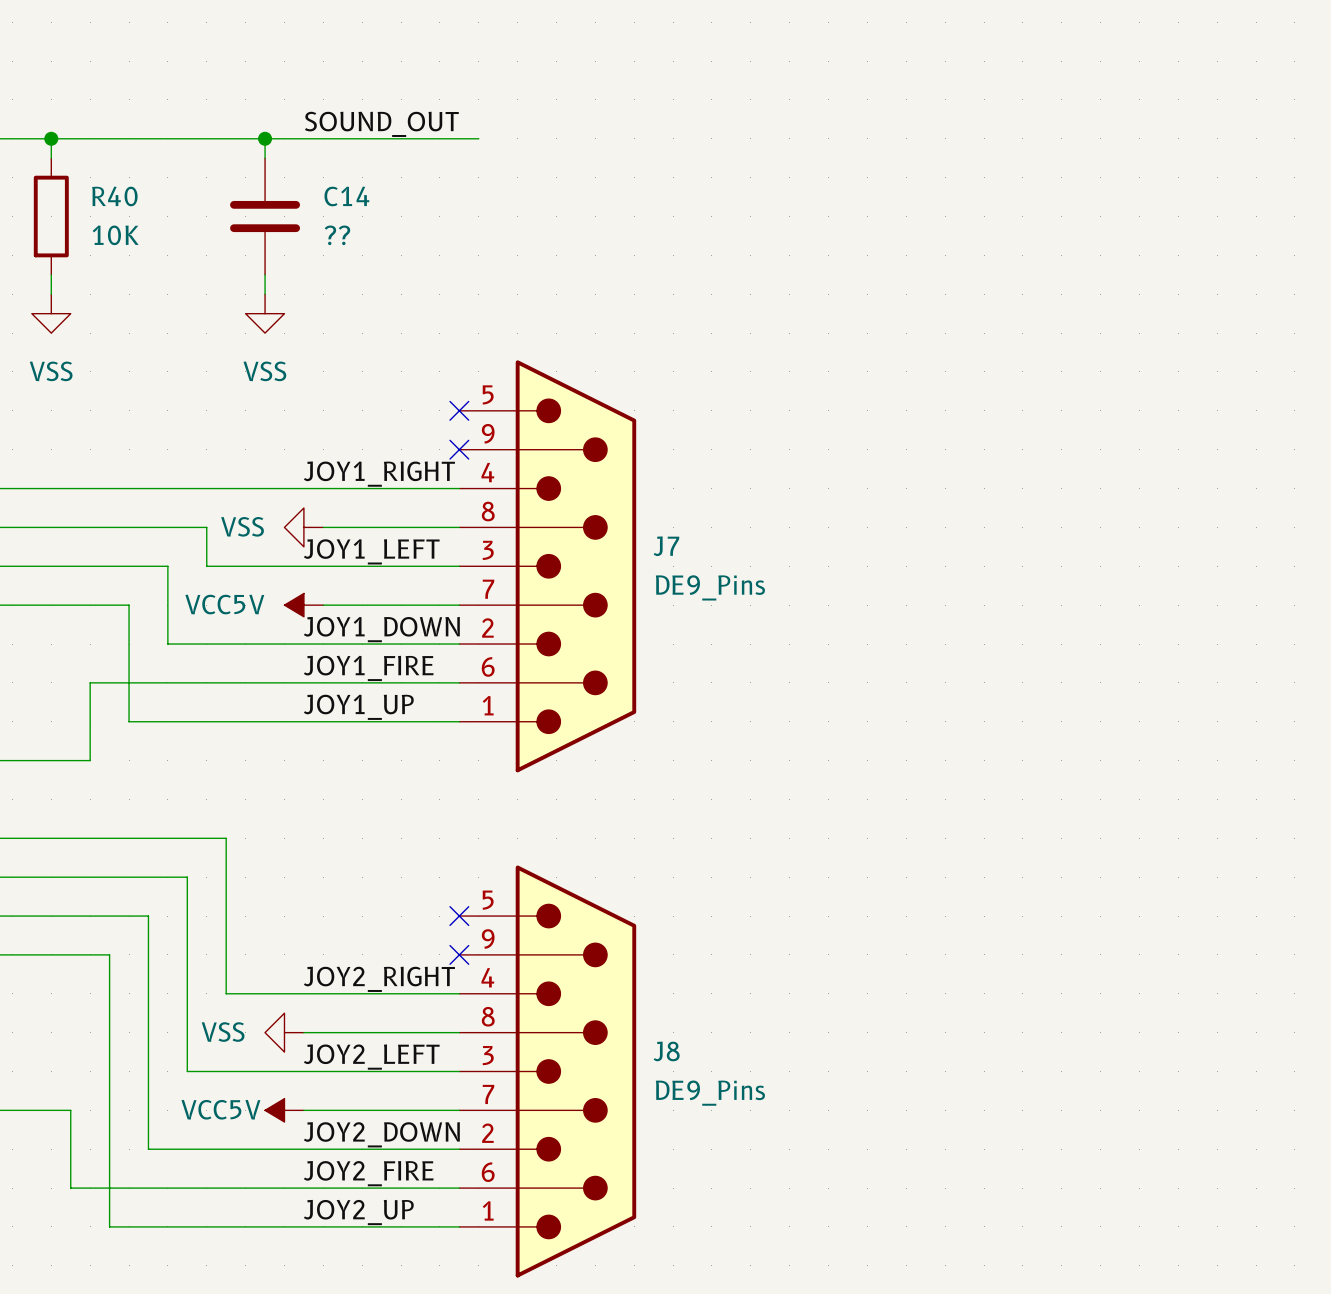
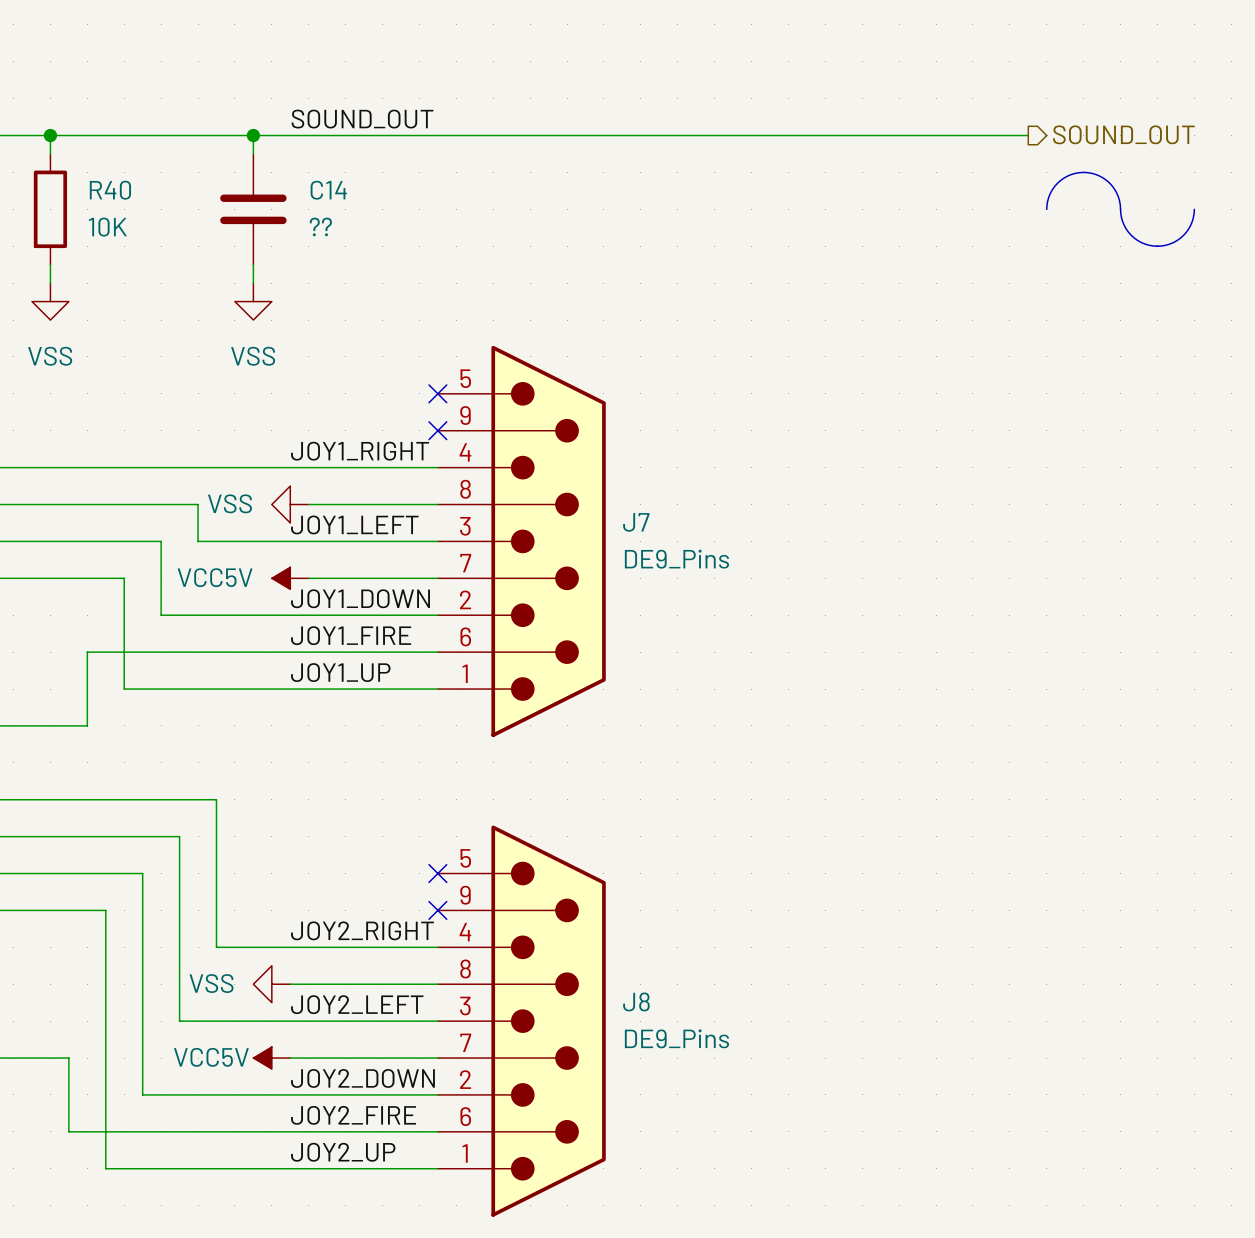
wire: none -> (456, 135) (1028, 135)
hierarchical label: none -> SOUND_OUT (1123, 134)
line: none -> (1046, 209) (1050, 193) (1057, 183) (1067, 176) (1083, 172) (1099, 176) (1112, 186) (1118, 197) (1121, 217) (1126, 228) (1134, 238) (1145, 244) (1165, 245) (1180, 238) (1190, 225) (1194, 209)

